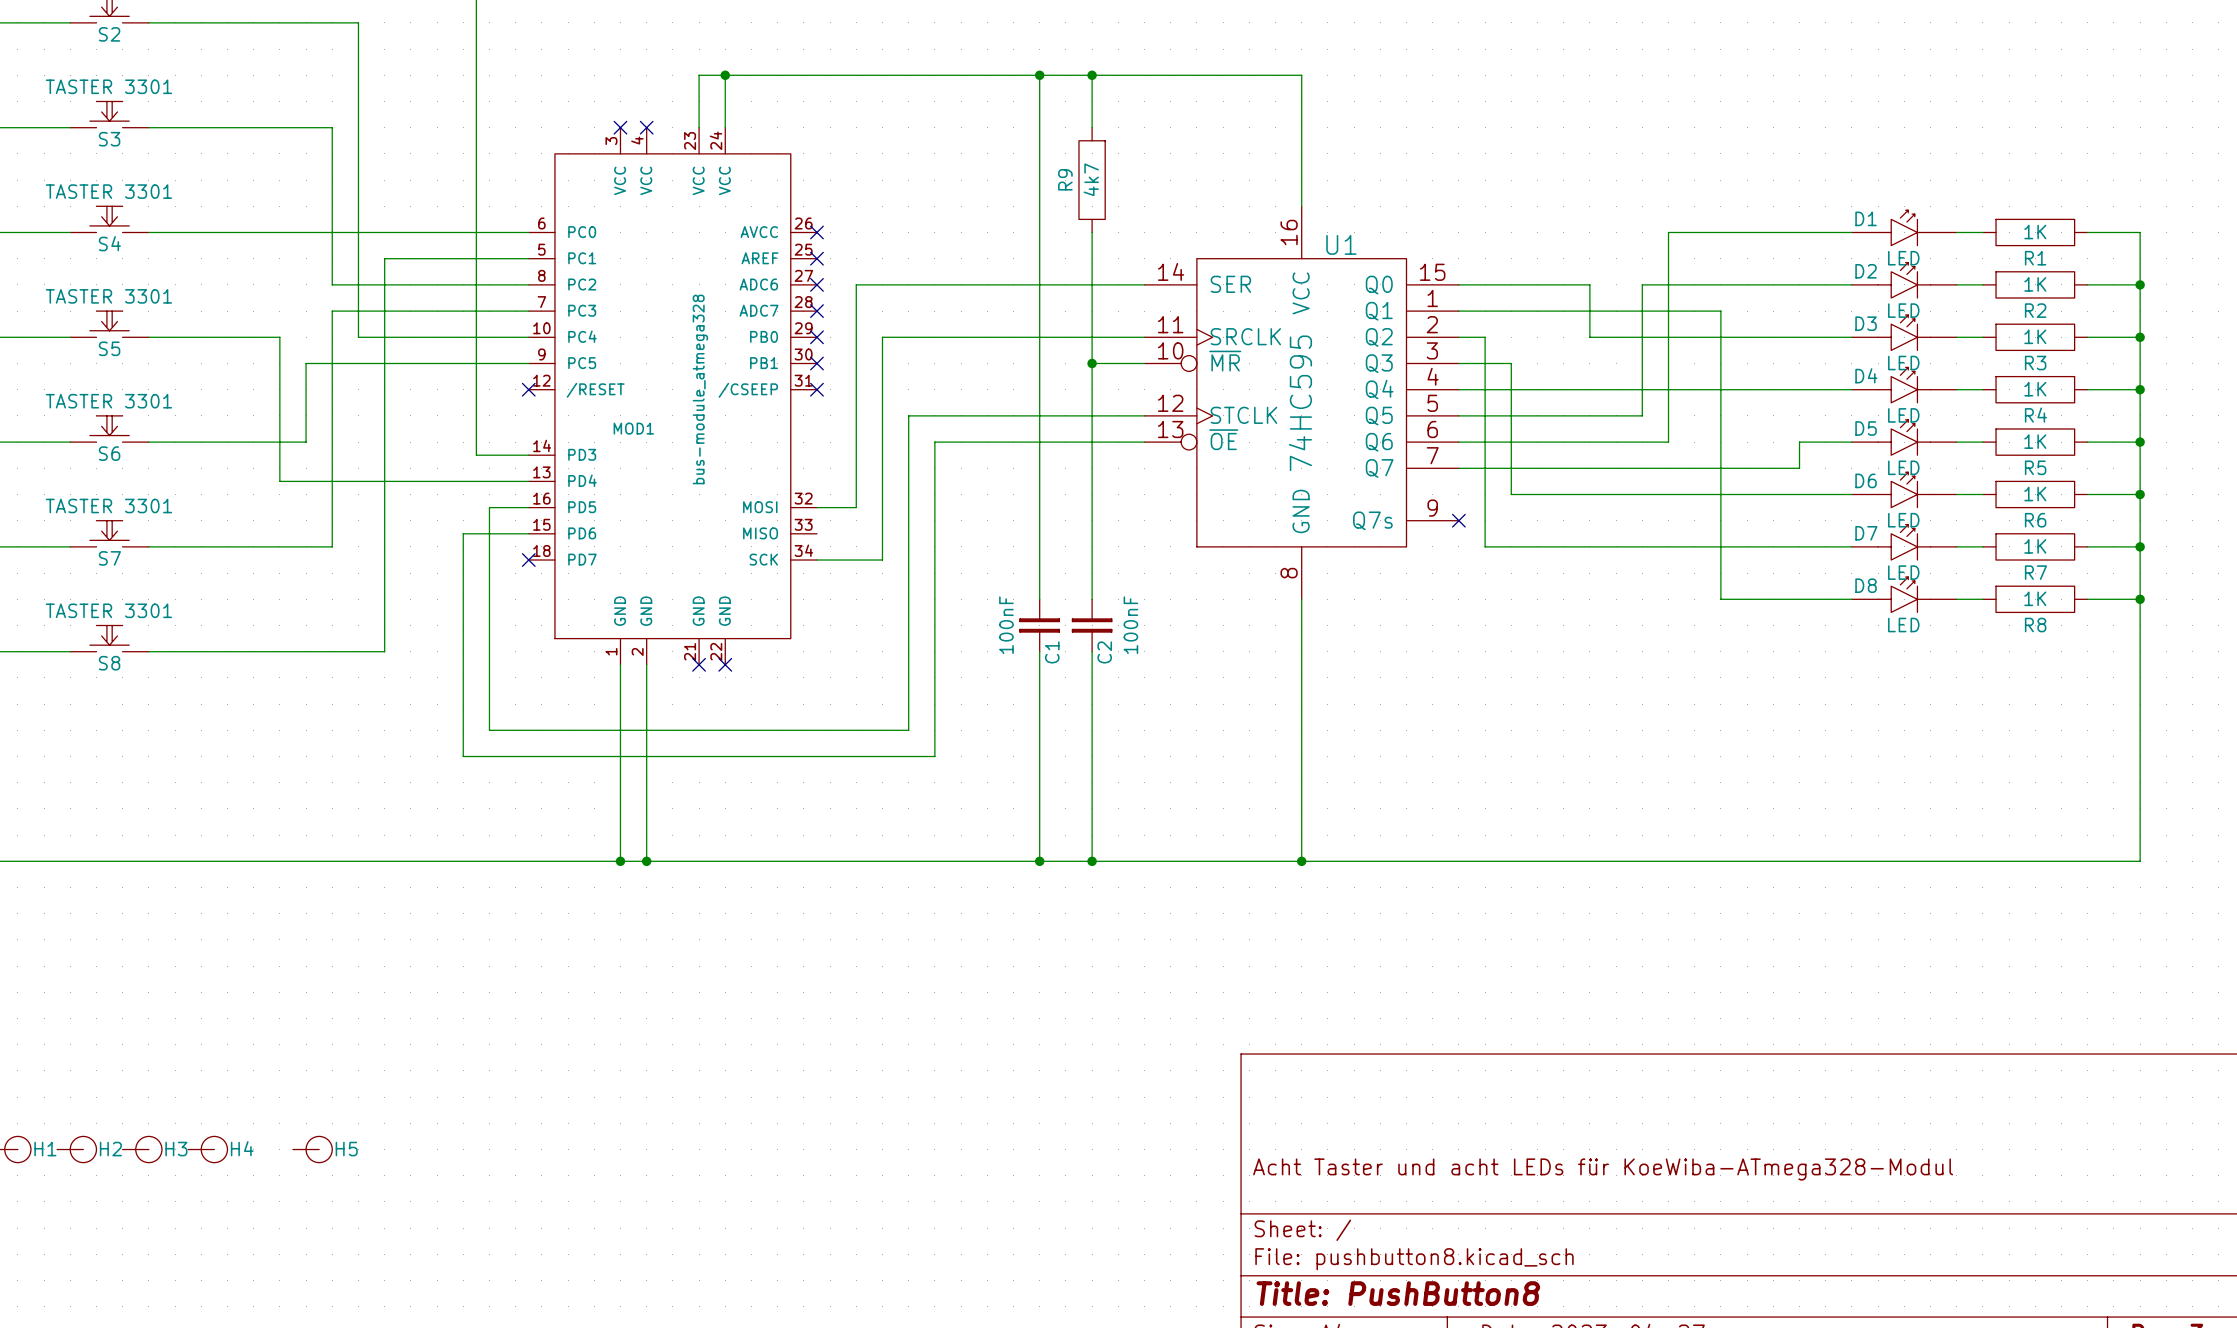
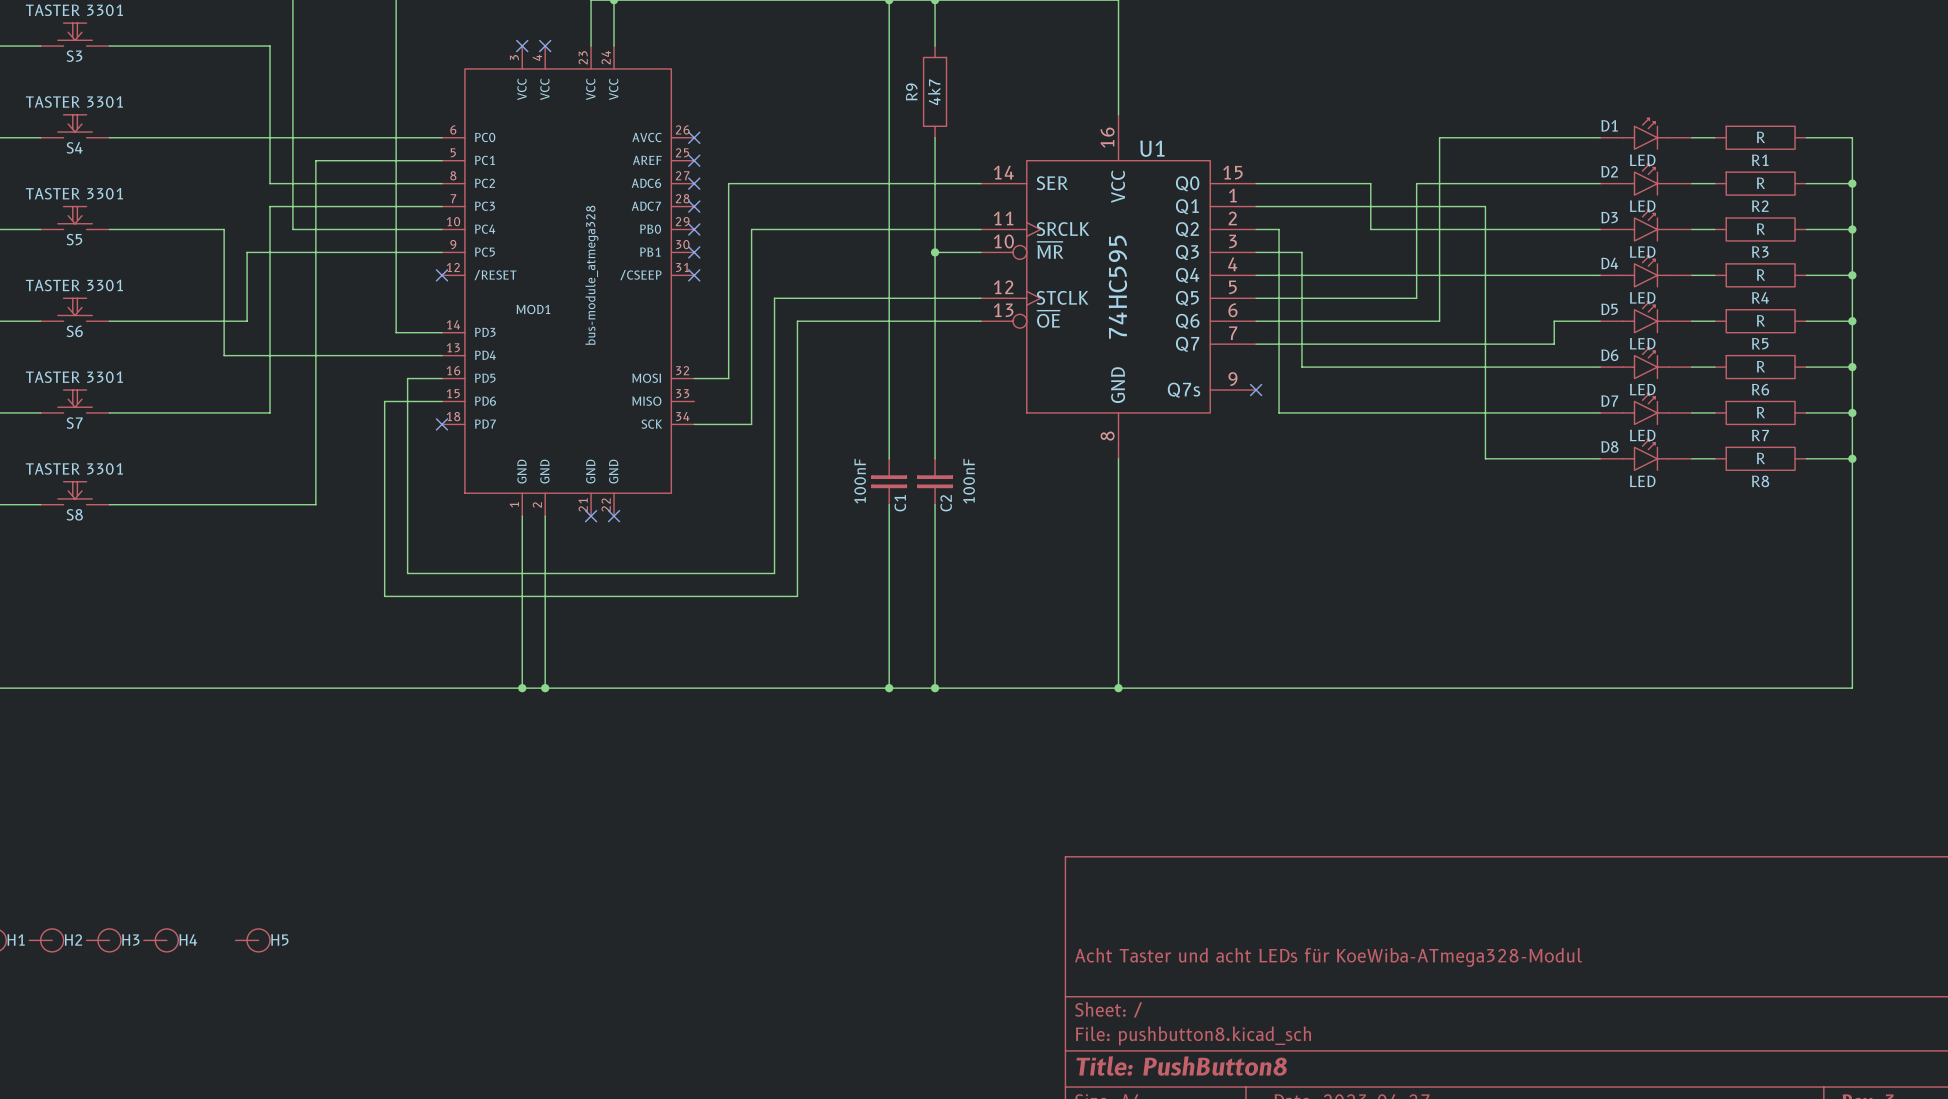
R1 value: 1K (2035, 232) -> R (1760, 137)
R2 value: 1K (2035, 284) -> R (1760, 183)
R3 value: 1K (2035, 336) -> R (1760, 229)
R4 value: 1K (2035, 389) -> R (1760, 274)
R5 value: 1K (2035, 441) -> R (1760, 320)
R6 value: 1K (2035, 494) -> R (1760, 366)
R7 value: 1K (2035, 546) -> R (1760, 412)
R8 value: 1K (2035, 598) -> R (1760, 458)

